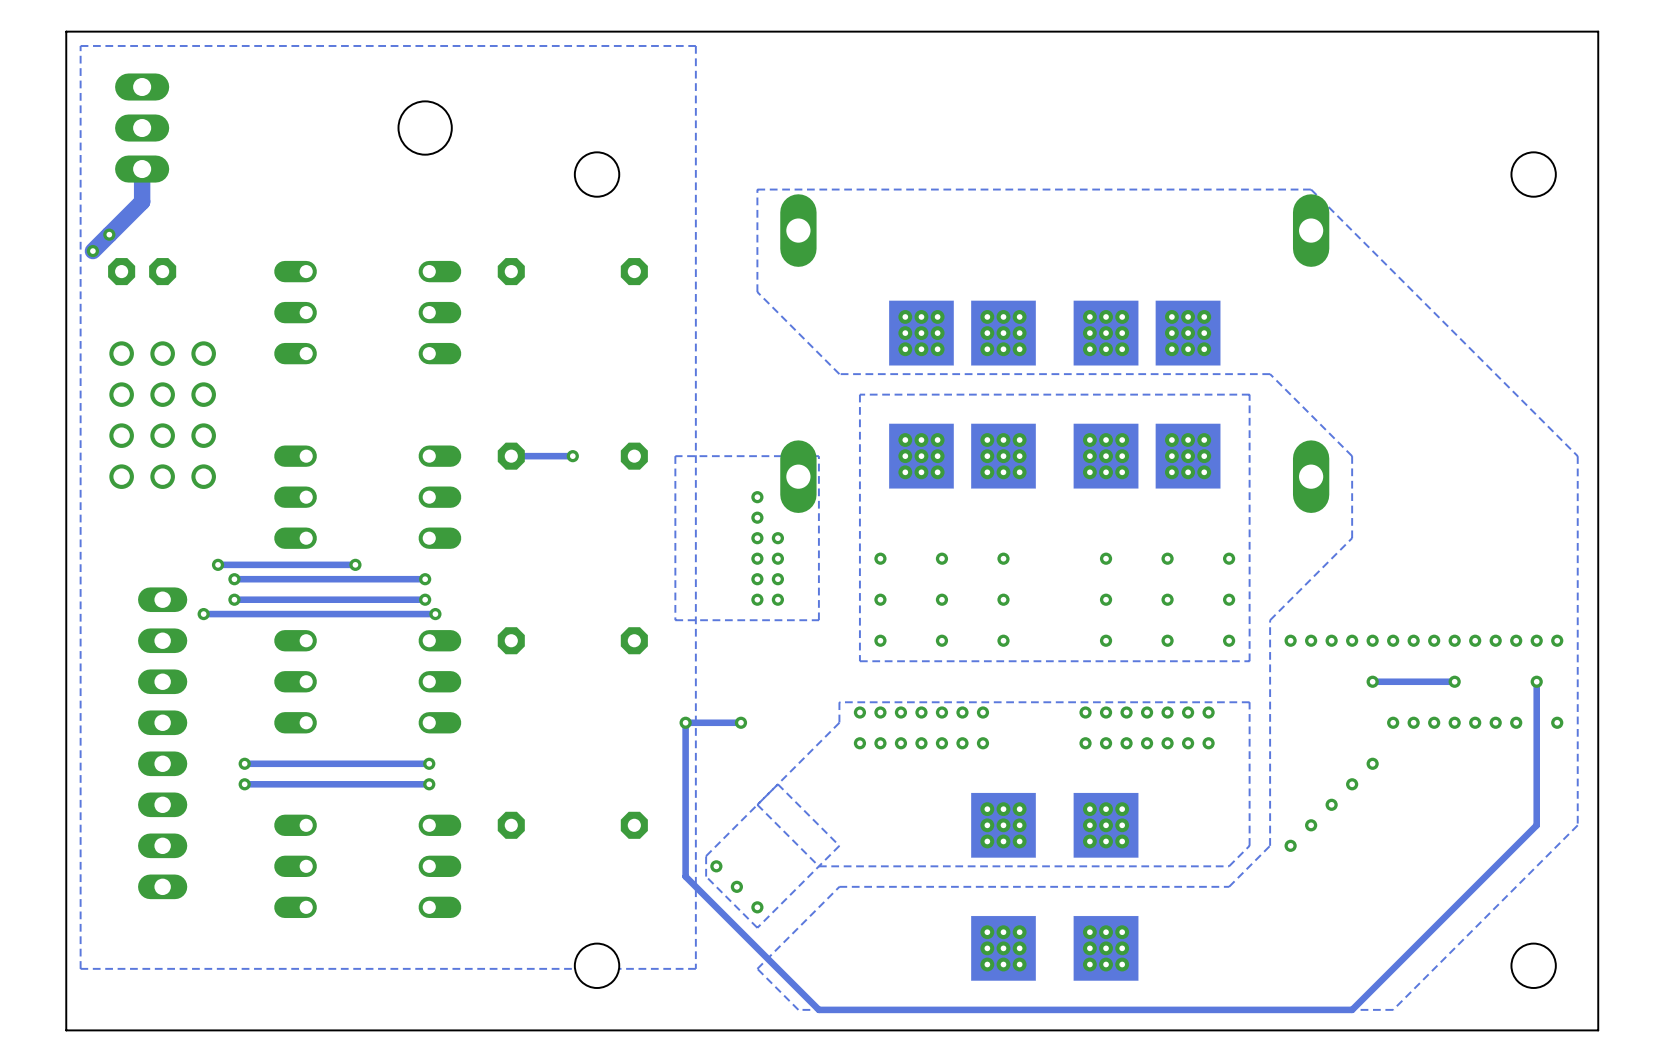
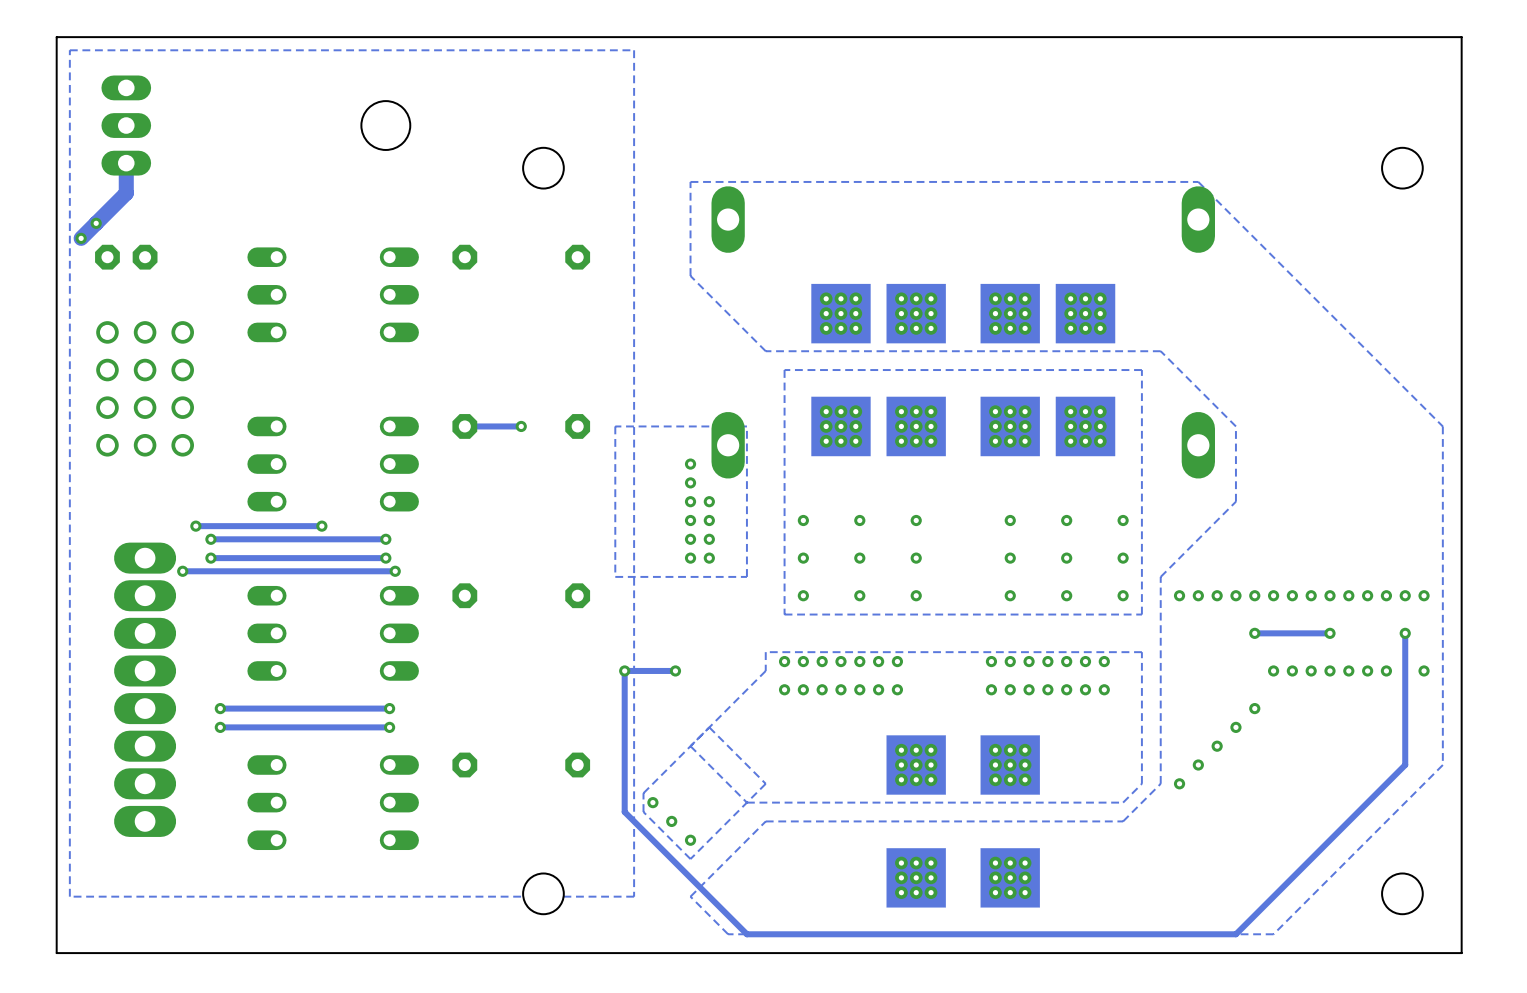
part footprint: [138, 587, 188, 900] -> [114, 542, 177, 837]

